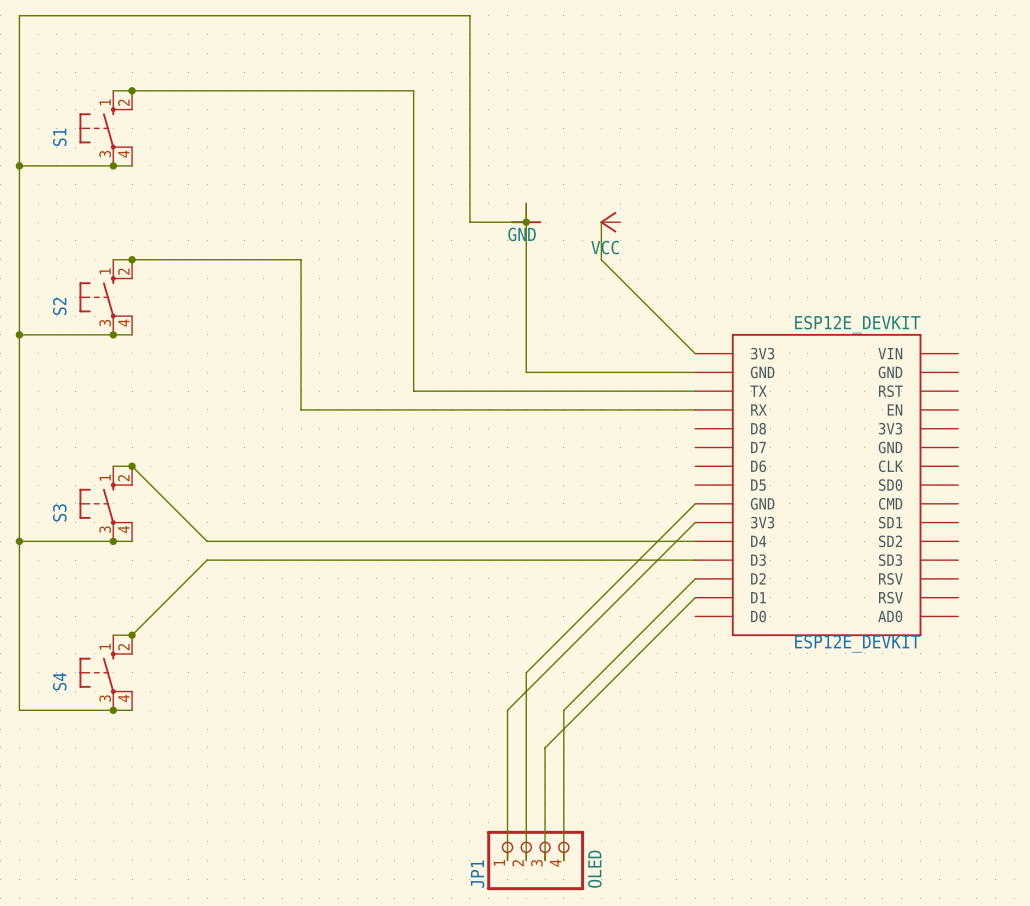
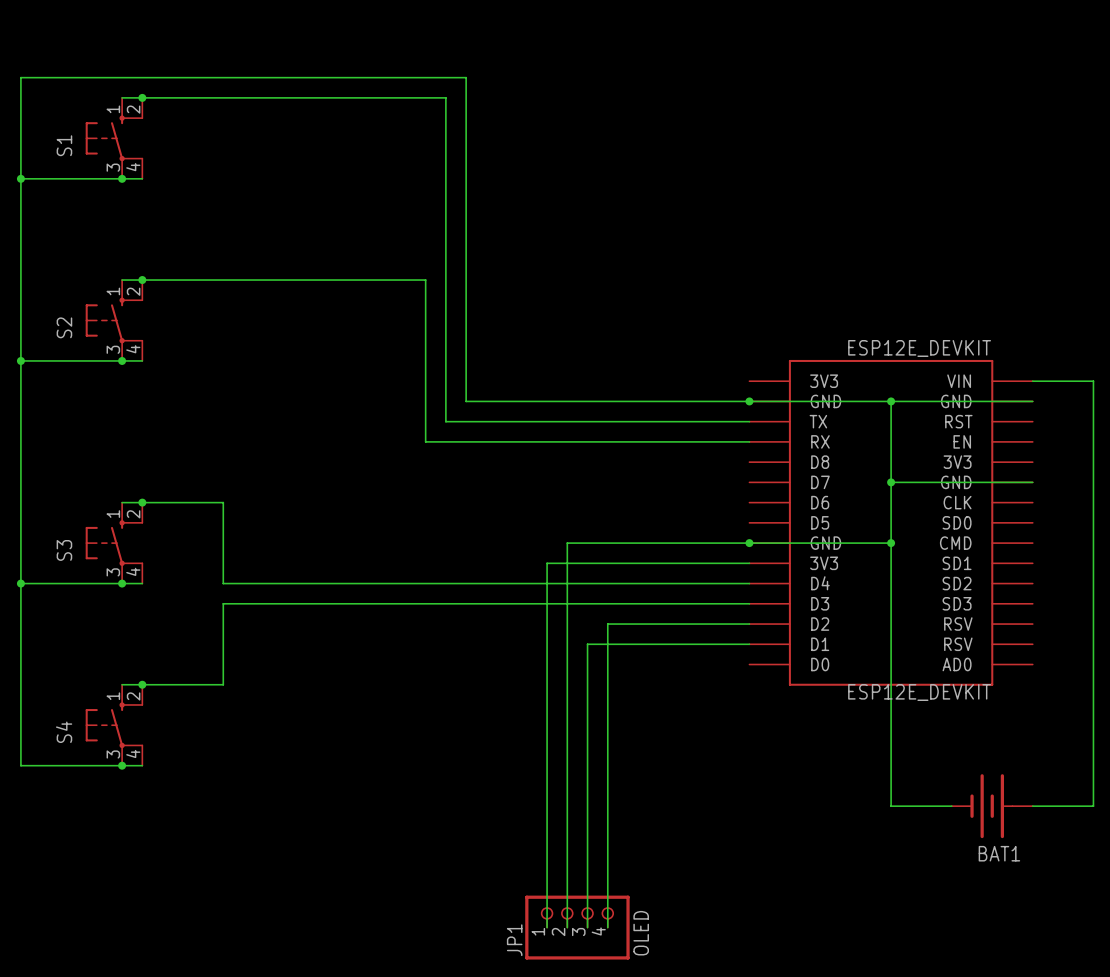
wire: (19, 72) (19, 15) (469, 15) (469, 222) (526, 222) -> (20, 77) (466, 77) (466, 401) (567, 401)
wire: (526, 203) (526, 372) -> none
power symbol: GND (526, 213) -> none
junction: (526, 222) -> none
wire: (601, 222) (601, 259) (695, 353) -> none
power symbol: VCC (610, 222) -> none
wire: (301, 259) (301, 409) (394, 409) -> (324, 280) (425, 280) (425, 441)
wire: none -> (1032, 381) (1093, 381) (1093, 806) (1032, 806)
wire: none -> (749, 401) (1032, 401)
junction: none -> (749, 401)
wire: none -> (891, 401) (891, 806) (951, 806)
junction: none -> (891, 401)
wire: none -> (891, 482) (1032, 482)
junction: none -> (891, 482)
wire: (132, 466) (207, 541) -> (142, 502) (223, 502) (223, 583)
wire: (695, 503) (526, 672) -> (891, 543) (567, 543) (567, 725)
junction: none -> (749, 543)
junction: none -> (891, 543)
wire: (695, 522) (507, 710) -> (749, 563) (547, 563) (547, 765)
wire: (207, 560) (132, 635) -> (223, 603) (223, 684) (142, 684)
wire: (695, 578) (563, 710) -> (749, 624) (607, 624) (607, 765)
wire: (695, 597) (545, 747) -> (749, 644) (587, 644) (587, 806)
BAT1: none -> (992, 806)

